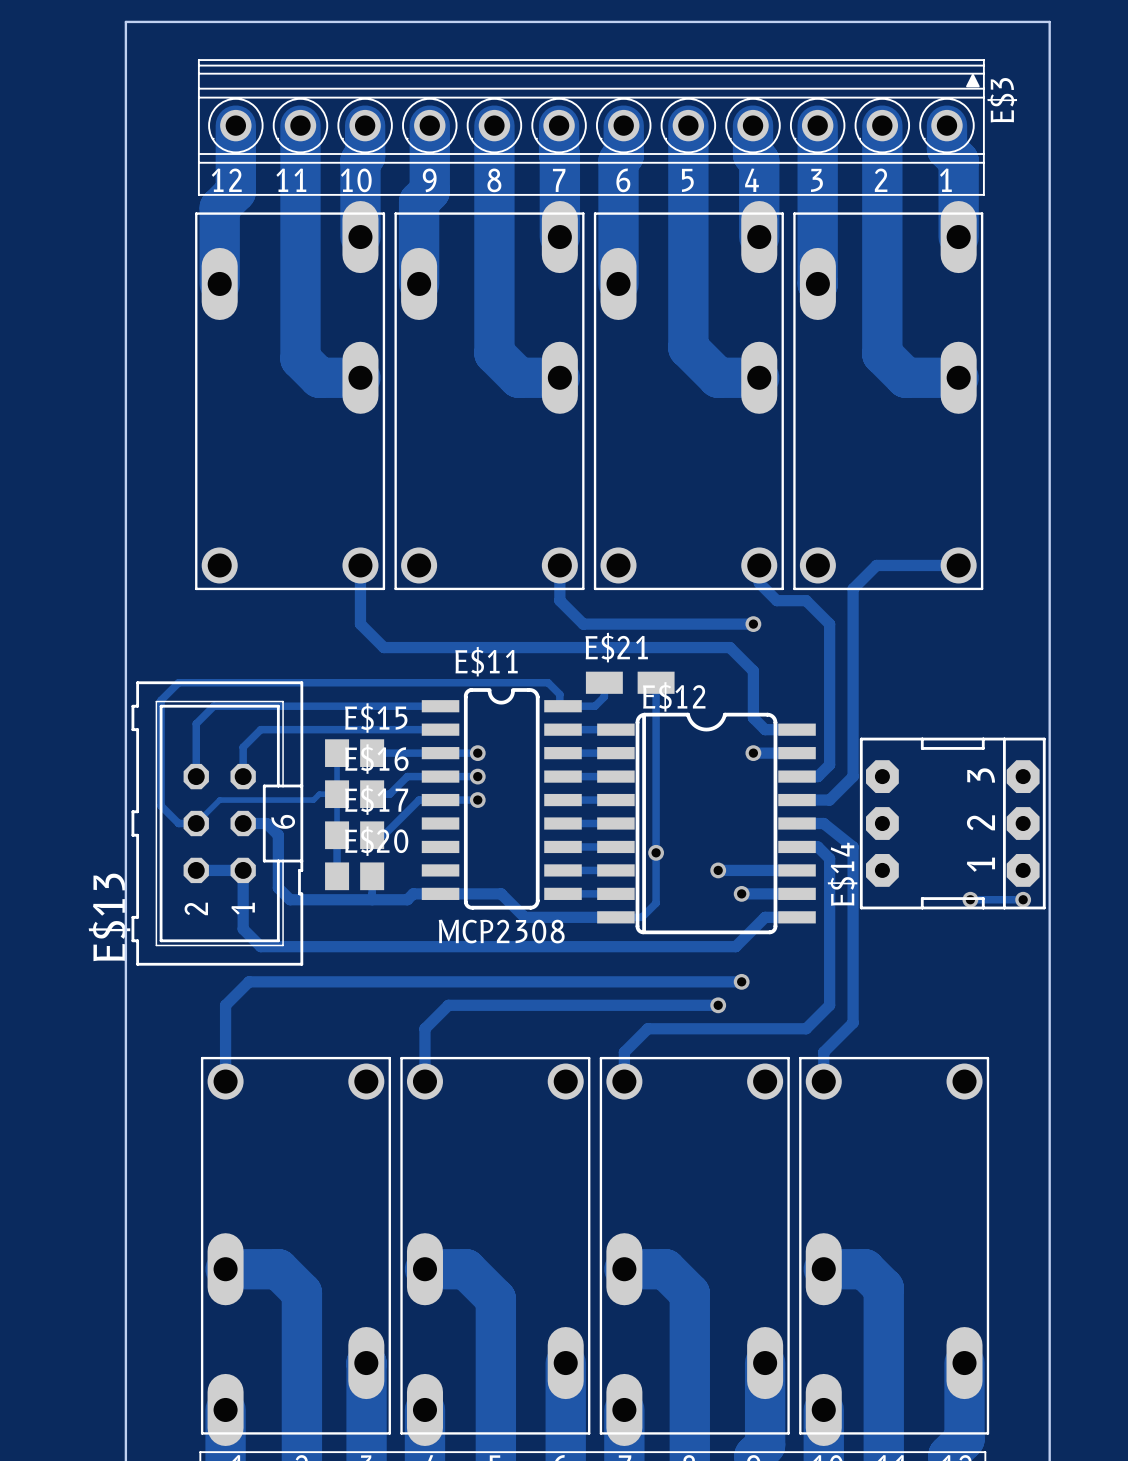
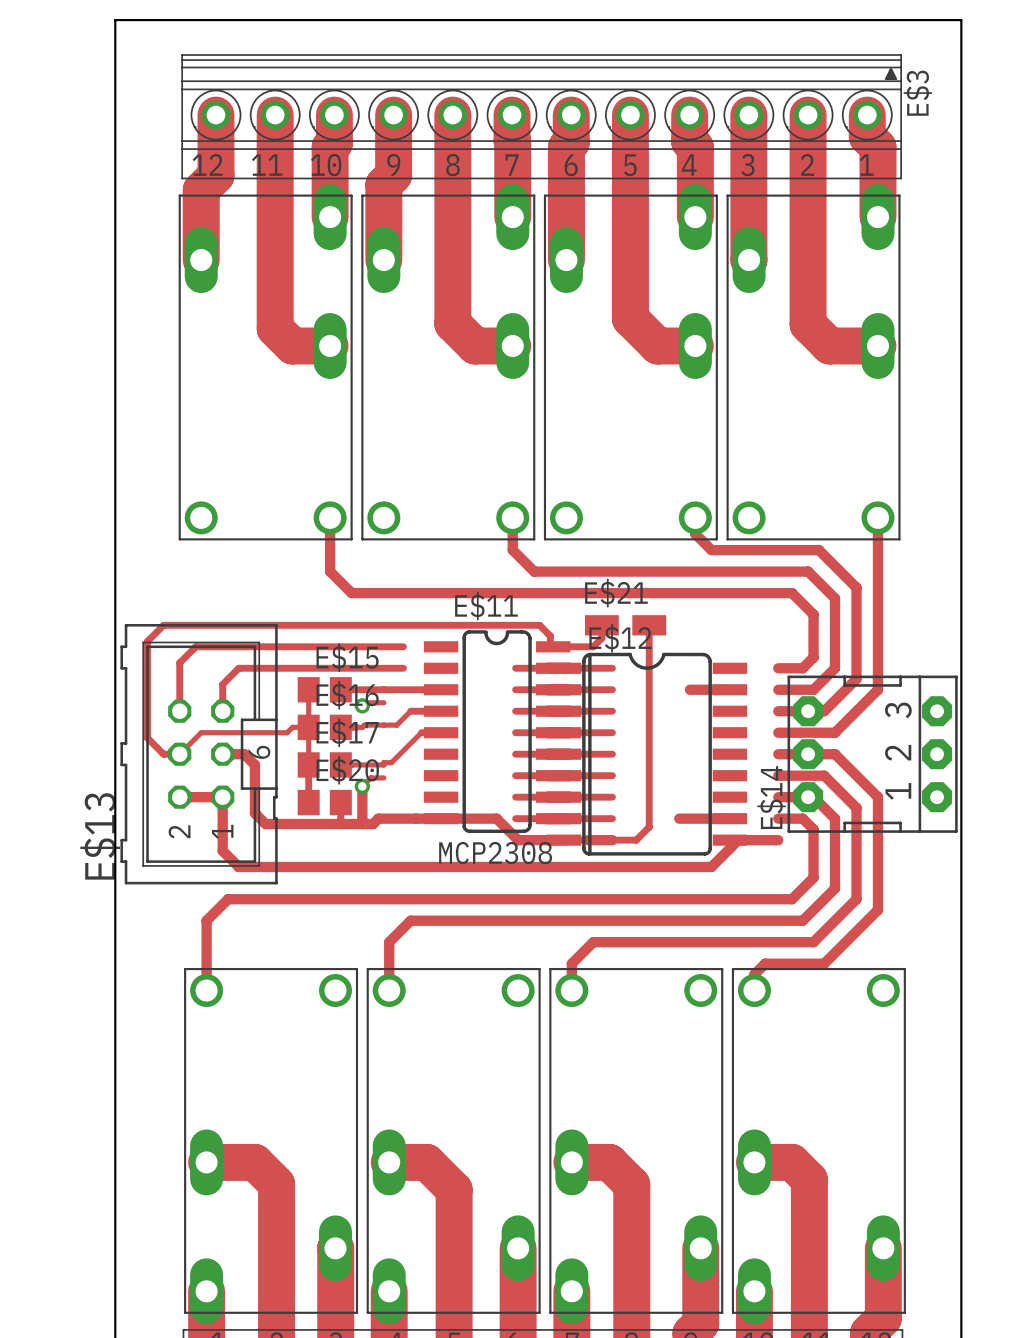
track: (958, 565) (876, 565) (853, 588) (853, 776) (829, 800) (797, 800) -> (877, 517) (877, 689) (835, 732) (778, 732)
track: (806, 600) (829, 624) (829, 764) (817, 776) (797, 776) -> (738, 550) (818, 550) (856, 587) (856, 679) (824, 711) (778, 711)
track: none -> (689, 571) (808, 571) (835, 598) (835, 668) (813, 689) (778, 689)
via: (753, 624) -> none
track: (729, 647) (753, 671) (753, 717) (765, 729) (797, 729) -> (668, 593) (792, 593) (813, 614) (813, 657) (802, 668) (778, 668)
track: (548, 682) (559, 694) (559, 703) (563, 706) (595, 706) (604, 696) (604, 682) -> (502, 625) (539, 625) (550, 636) (550, 643) (553, 646) (593, 646) (601, 638) (601, 625)
E$21 position: (630, 682) -> (625, 625)
track: (656, 682) (656, 903) (641, 917) -> (649, 625) (649, 827) (636, 840) (587, 840)
track: none -> (564, 668) (612, 668)
via: (477, 753) -> none
track: none -> (564, 689) (612, 689)
via: (753, 753) -> none
track: none -> (383, 702) (365, 702) (362, 705)
via: none -> (362, 705)
track: (448, 776) (407, 776) (389, 794) -> (410, 711) (396, 725) (364, 725) (362, 727) (356, 727)
via: (477, 776) -> none
track: none -> (564, 711) (612, 711)
E$11 position: (501, 798) -> (497, 731)
track: (460, 800) (419, 800) (383, 835) -> (421, 732) (391, 762) (383, 762) (383, 764) (351, 764)
via: (477, 800) -> none
track: none -> (564, 732) (612, 732)
track: none -> (564, 754) (612, 754)
track: (797, 823) (823, 823) (853, 846) (853, 1022) (823, 1052) (823, 1063) -> (778, 754) (835, 754) (877, 797) (877, 909) (824, 963) (765, 963) (754, 974)
track: none -> (564, 775) (612, 775)
track: (797, 846) (817, 846) (829, 858) (829, 1005) (806, 1028) -> (778, 775) (824, 775) (856, 807) (856, 899) (813, 942) (738, 942)
track: none -> (383, 777) (370, 777) (362, 786) (362, 824)
via: (656, 852) -> none
via: none -> (362, 786)
track: none -> (564, 797) (612, 797)
track: (718, 870) (797, 870) -> none
via: (718, 870) -> none
track: none -> (778, 797) (813, 797) (835, 818) (835, 888) (802, 920) (657, 920)
track: (501, 893) (524, 917) (565, 917) -> (459, 818) (496, 818) (518, 840)
via: (741, 893) -> none
track: none -> (778, 818) (802, 818) (813, 829) (813, 877) (792, 899) (679, 899)
track: (970, 899) (1023, 899) -> (564, 818) (612, 818)
via: (970, 899) -> none
via: (1023, 899) -> none
track: (797, 917) (765, 917) (735, 946) -> (778, 840) (738, 840) (711, 867) (673, 867)
via: (741, 981) -> none
via: (718, 1005) -> none

